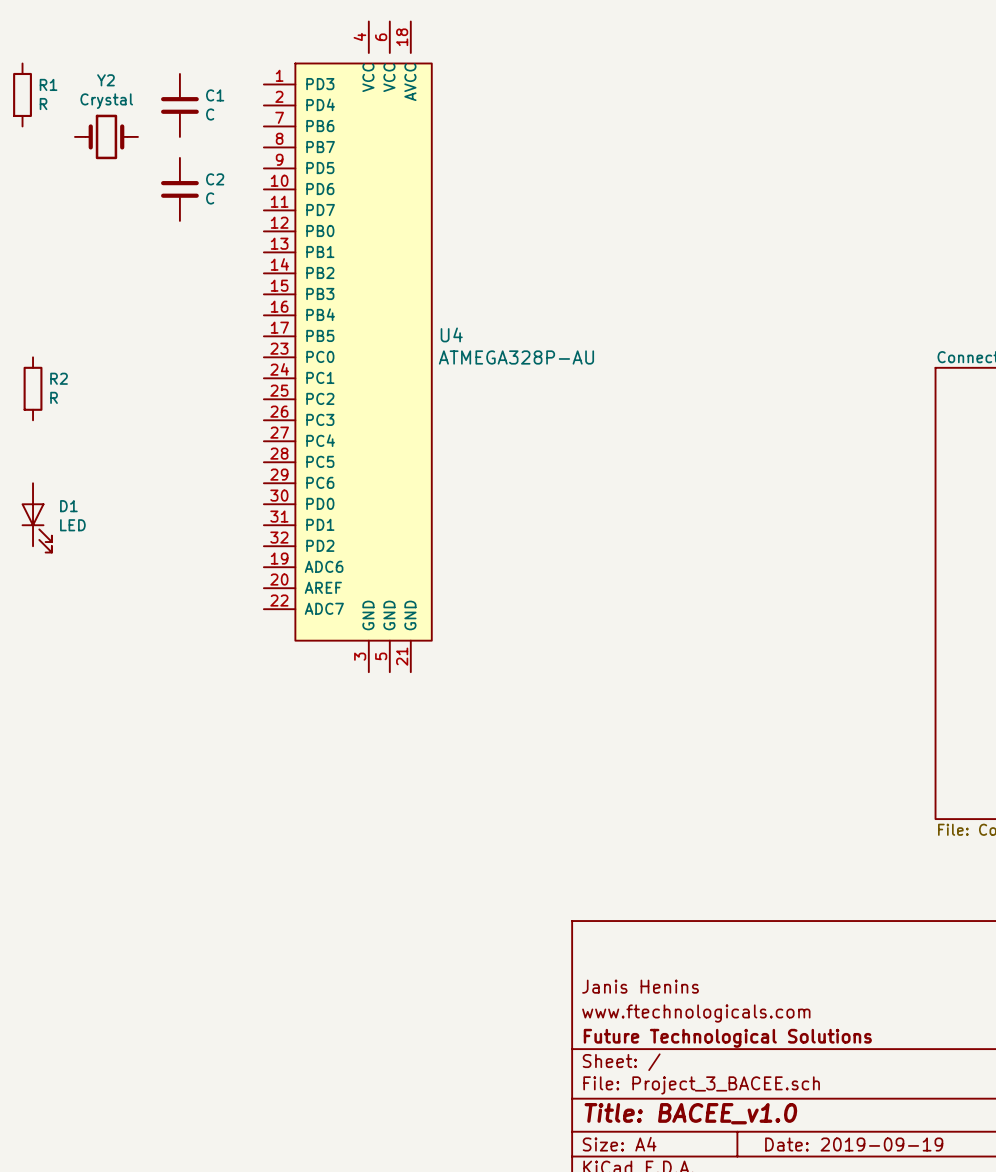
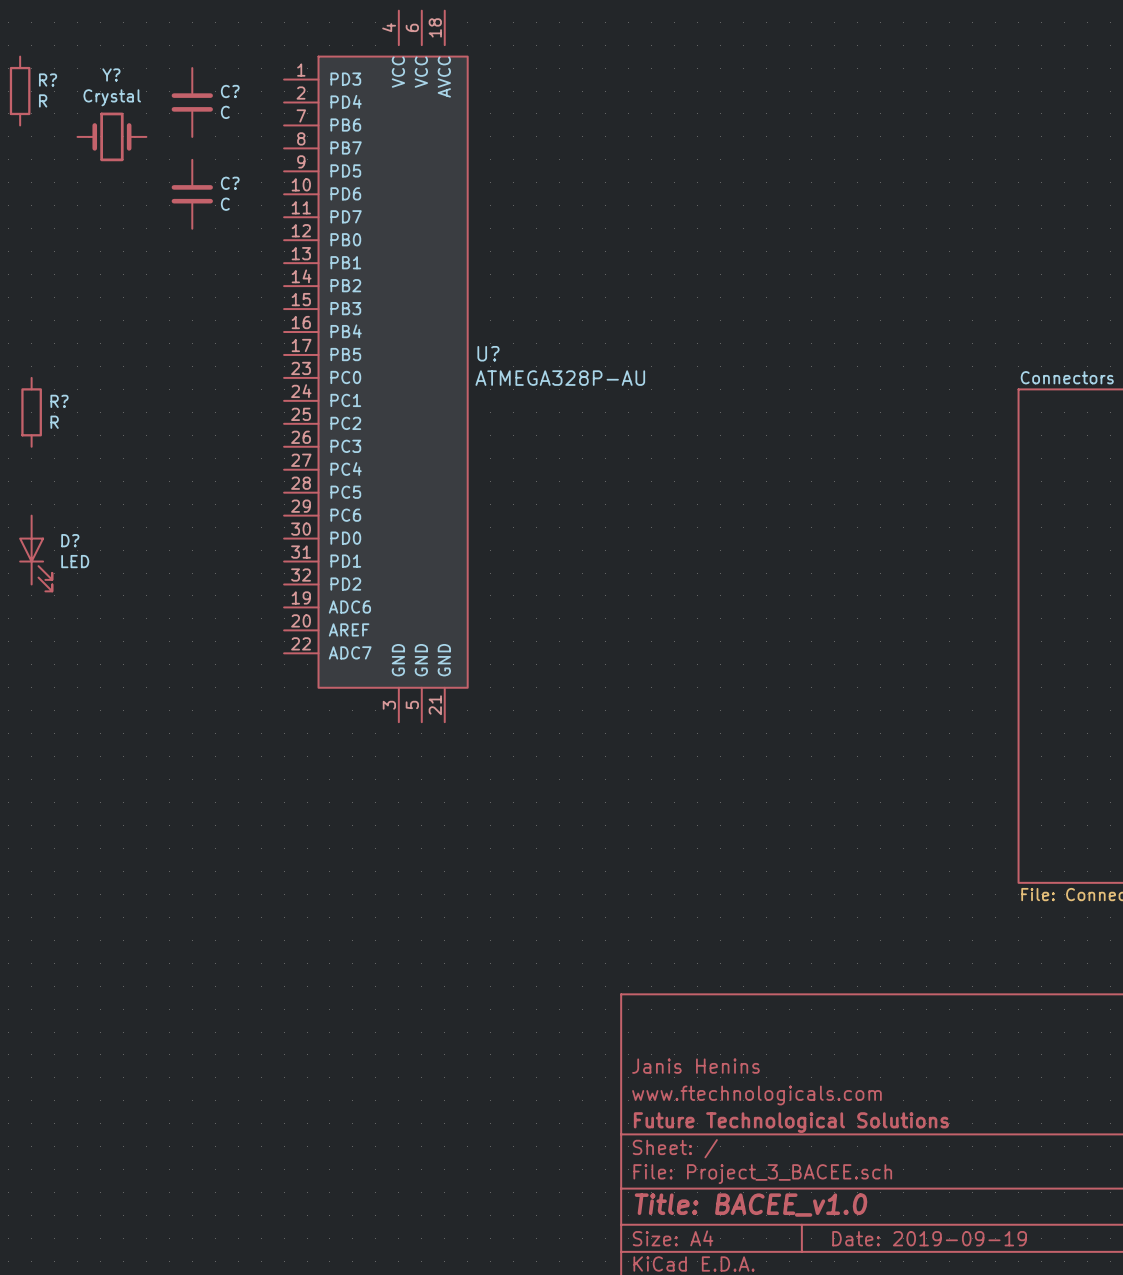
Y2 name: Y2 (105, 80) -> Y? (111, 74)
R1 name: R1 (48, 84) -> R? (48, 80)
C1 name: C1 (215, 95) -> C? (230, 91)
C2 name: C2 (215, 179) -> C? (230, 183)
U4 name: U4 (451, 334) -> U? (488, 353)
R2 name: R2 (59, 378) -> R? (59, 401)
D1 name: D1 (68, 506) -> D? (70, 540)

